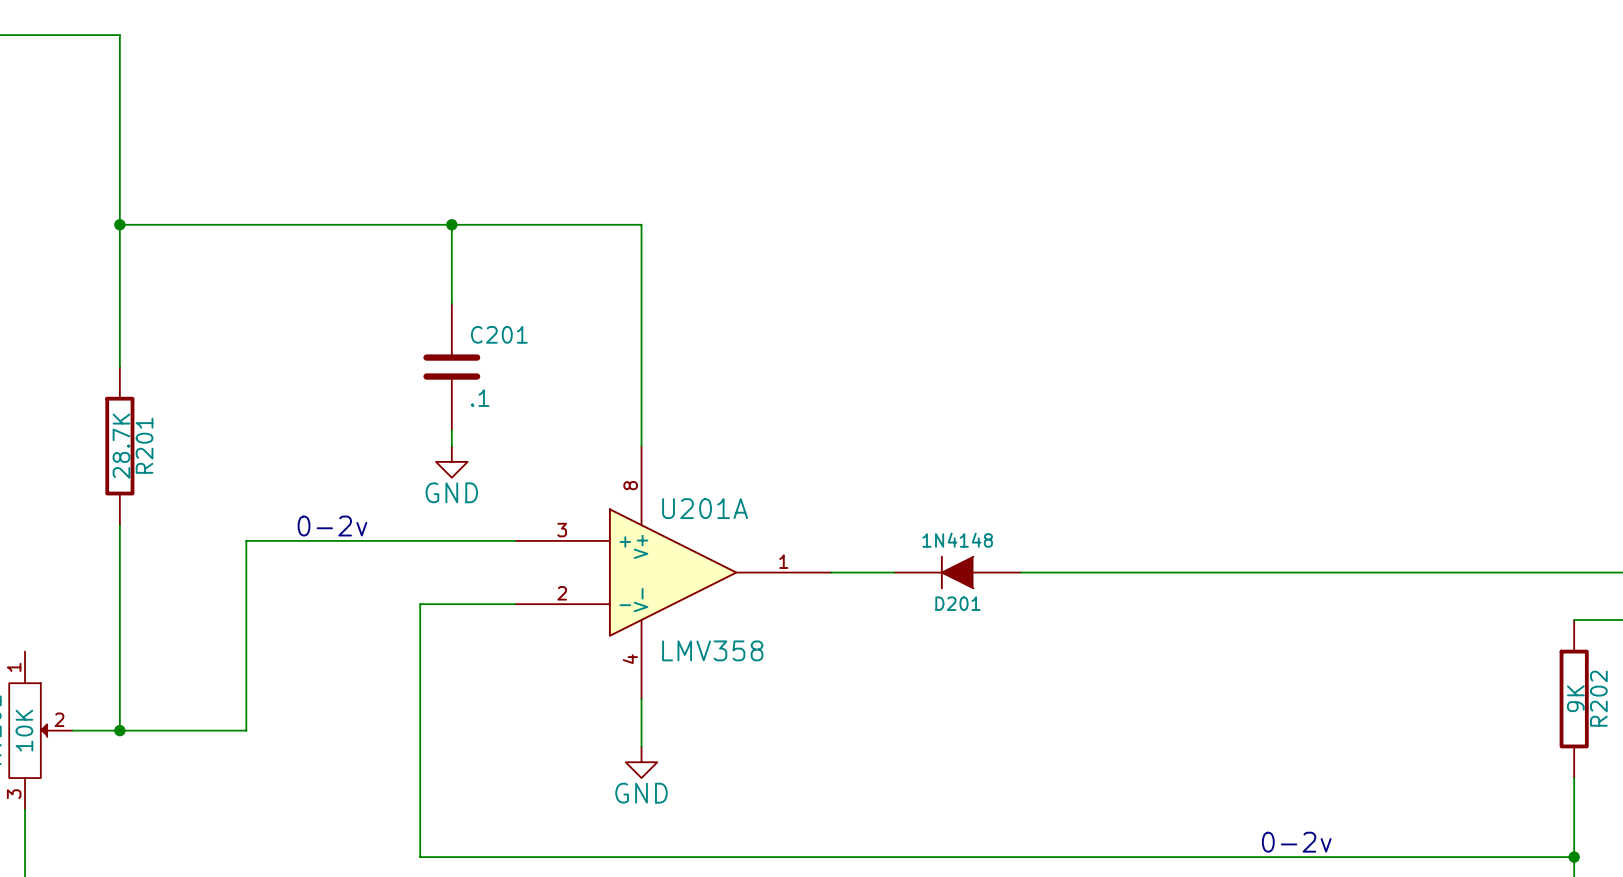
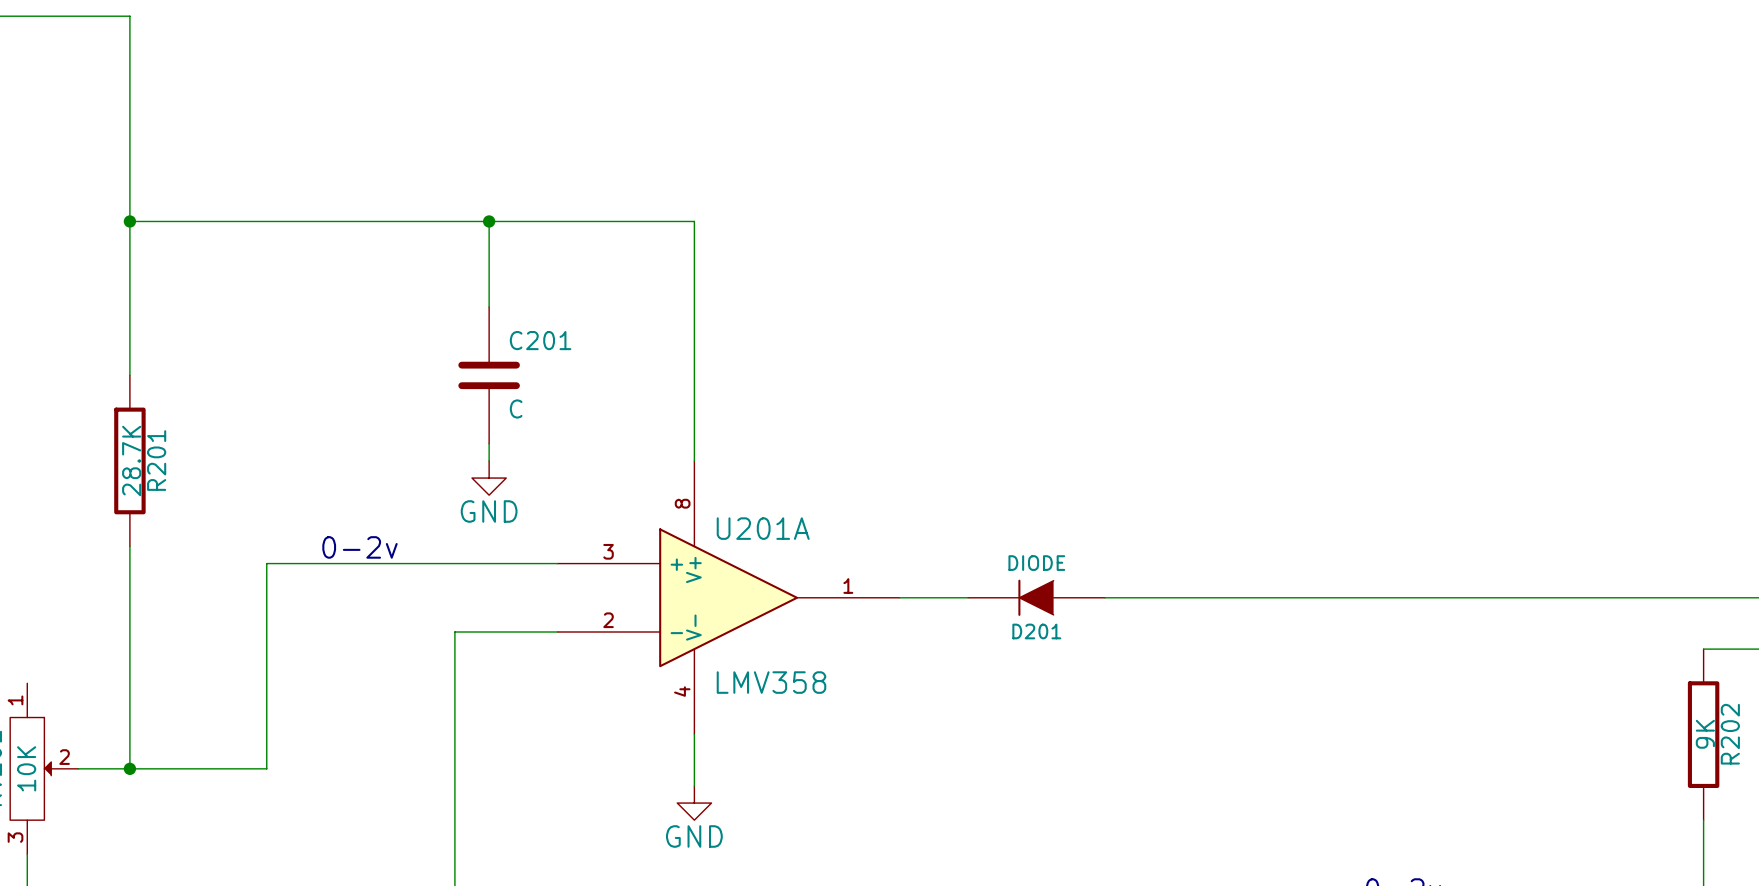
C201 value: .1 (480, 398) -> C (516, 408)
D201 value: 1N4148 (957, 540) -> DIODE (1036, 563)

